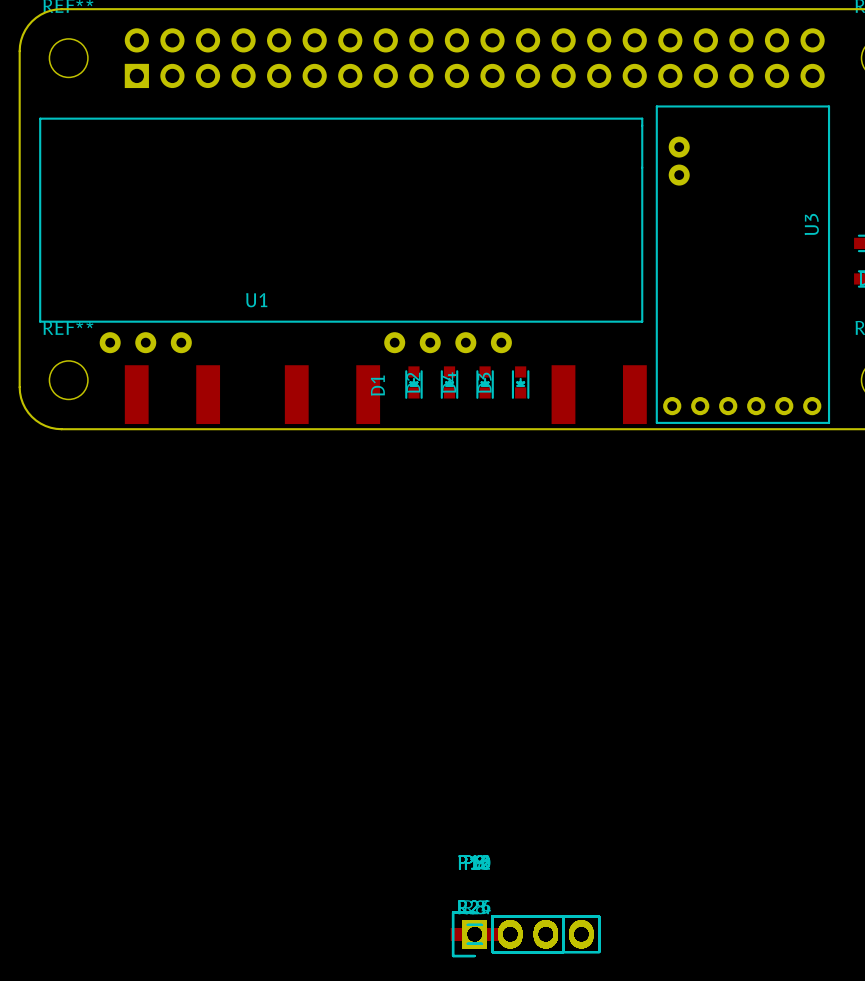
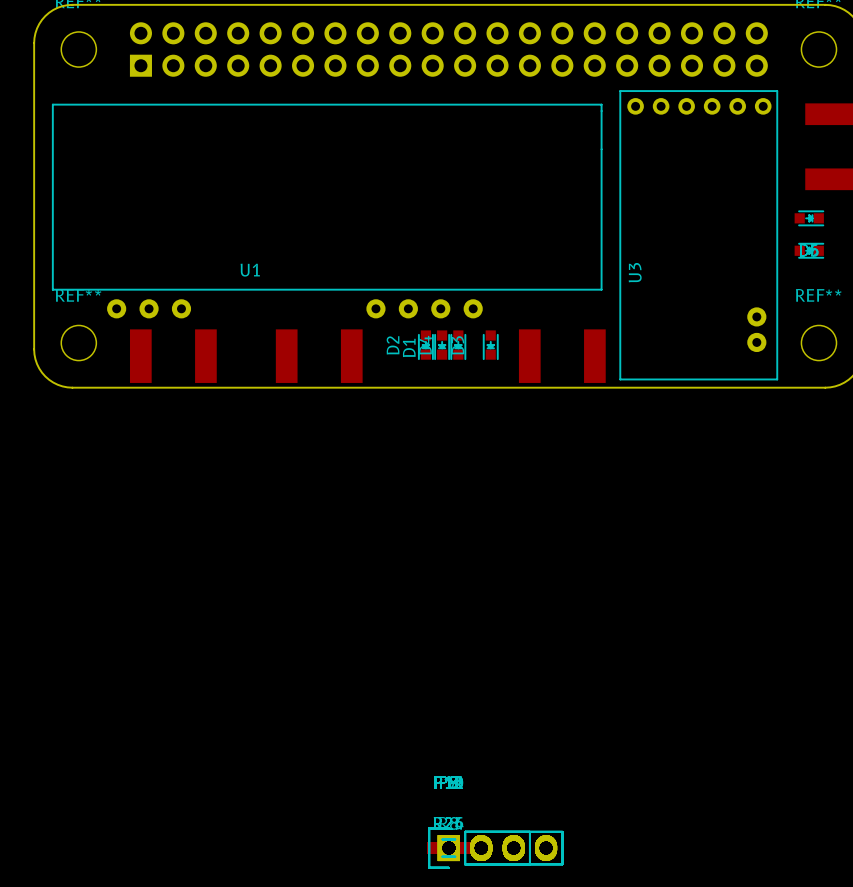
U3 rotation: 0° (742, 264) -> 180° (698, 235)
D1 position: (413, 382) -> (442, 345)

